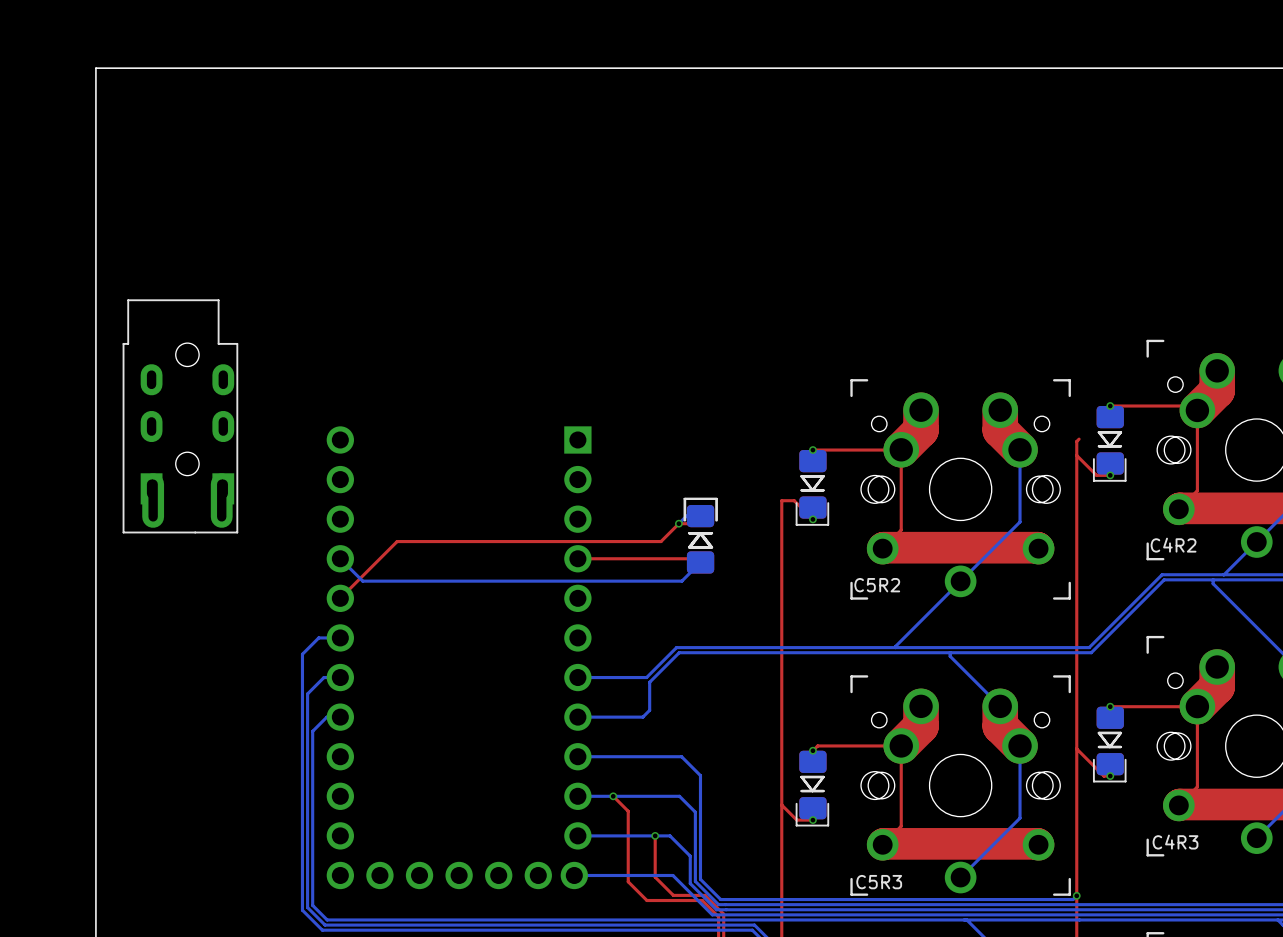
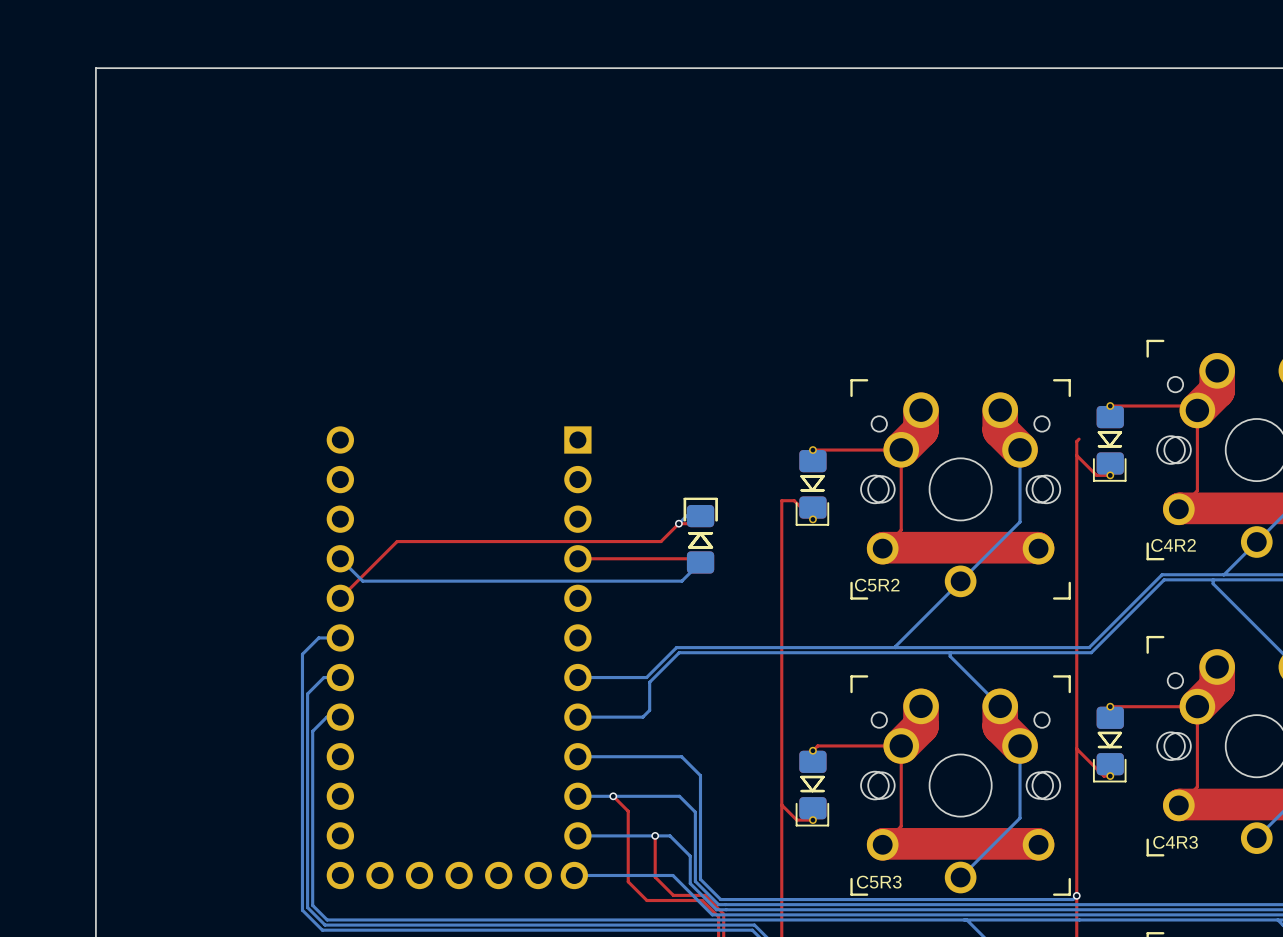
part: (180, 416) -> none

